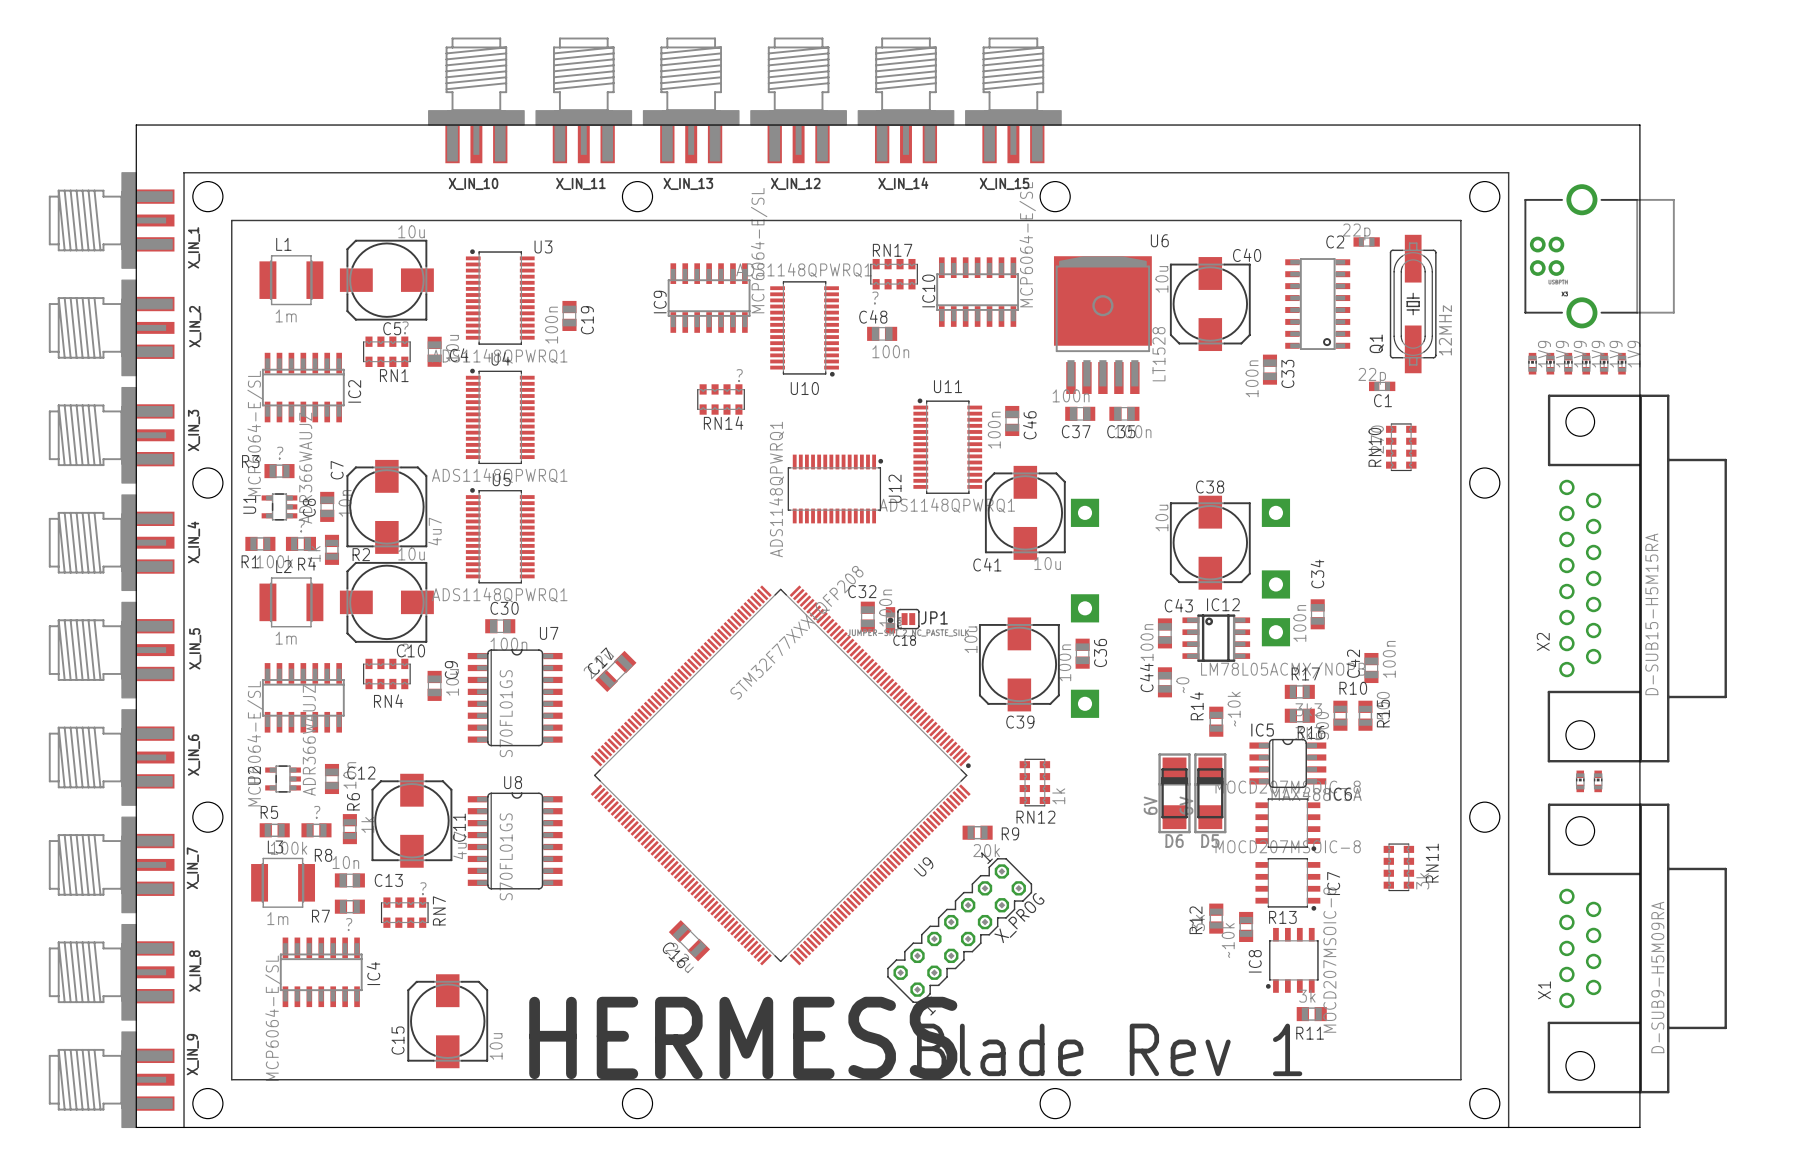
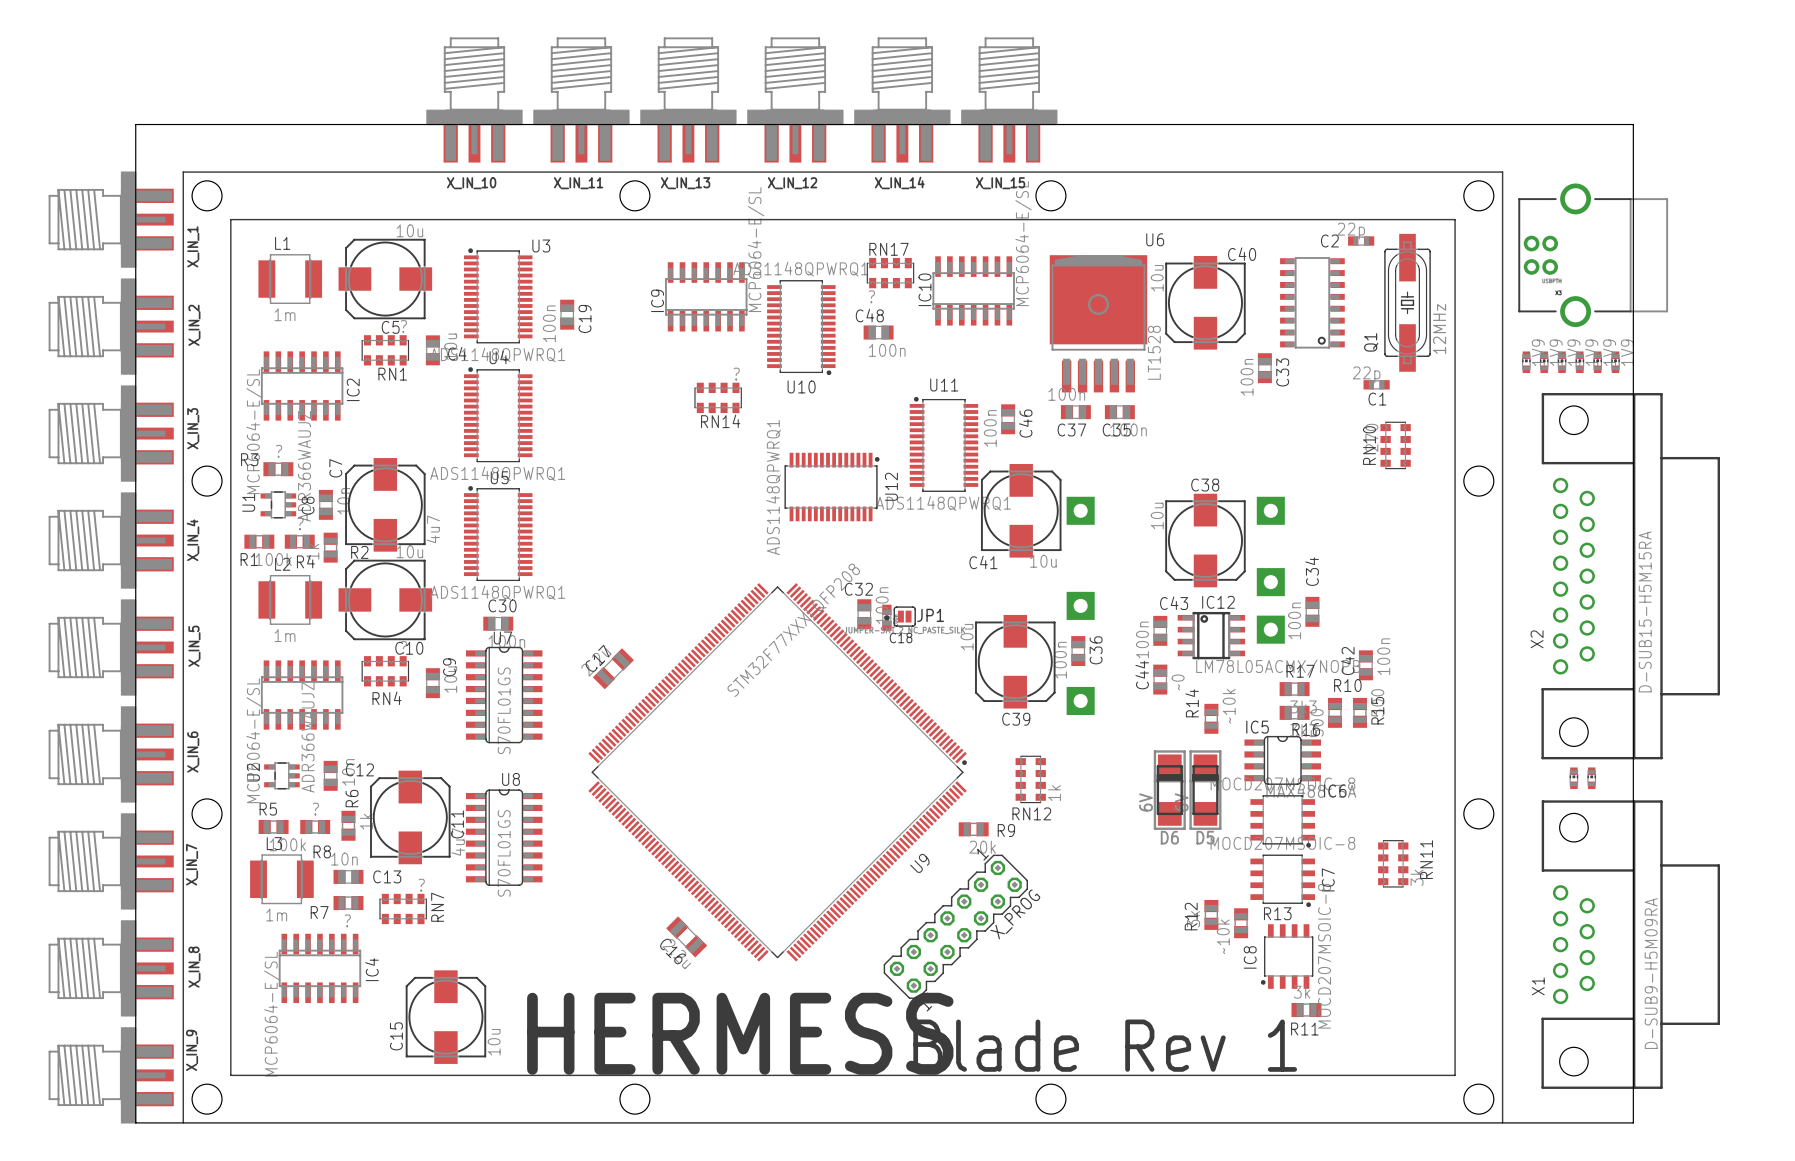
U7 name position: U7 (549, 633) -> U7 (502, 637)
U7 footprint: [467, 649, 563, 747] -> [465, 646, 543, 744]
U8 footprint: [467, 792, 563, 890] -> [465, 789, 543, 886]

